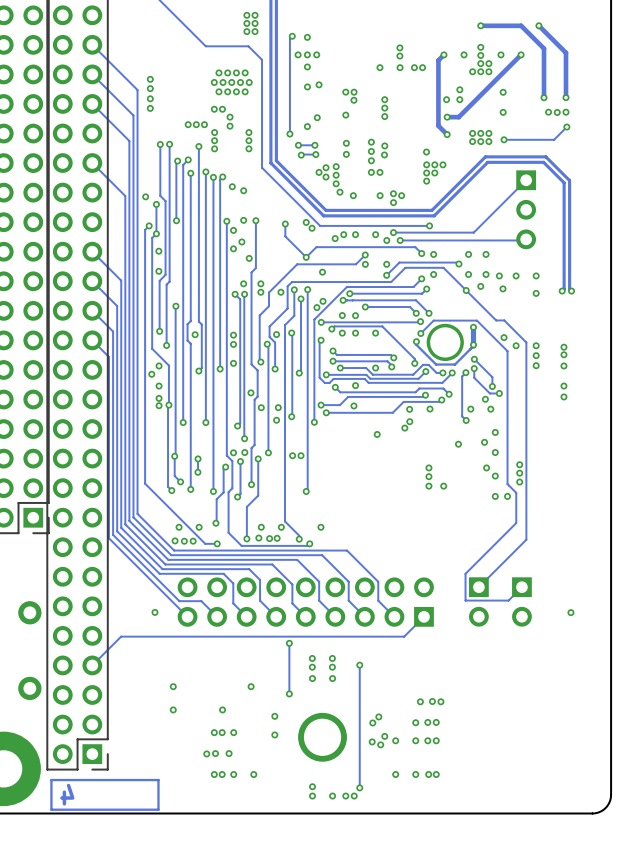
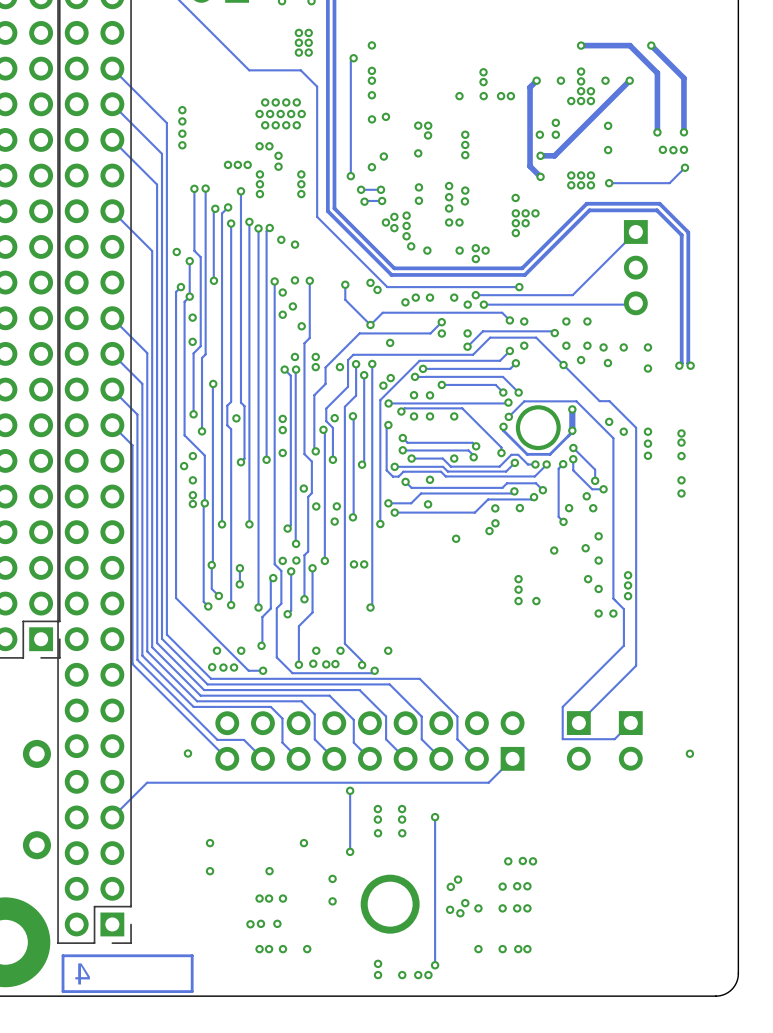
via: none -> (371, 45)
via: (307, 37) -> none
via: none -> (371, 70)
via: (298, 54) -> none
via: (316, 54) -> none

